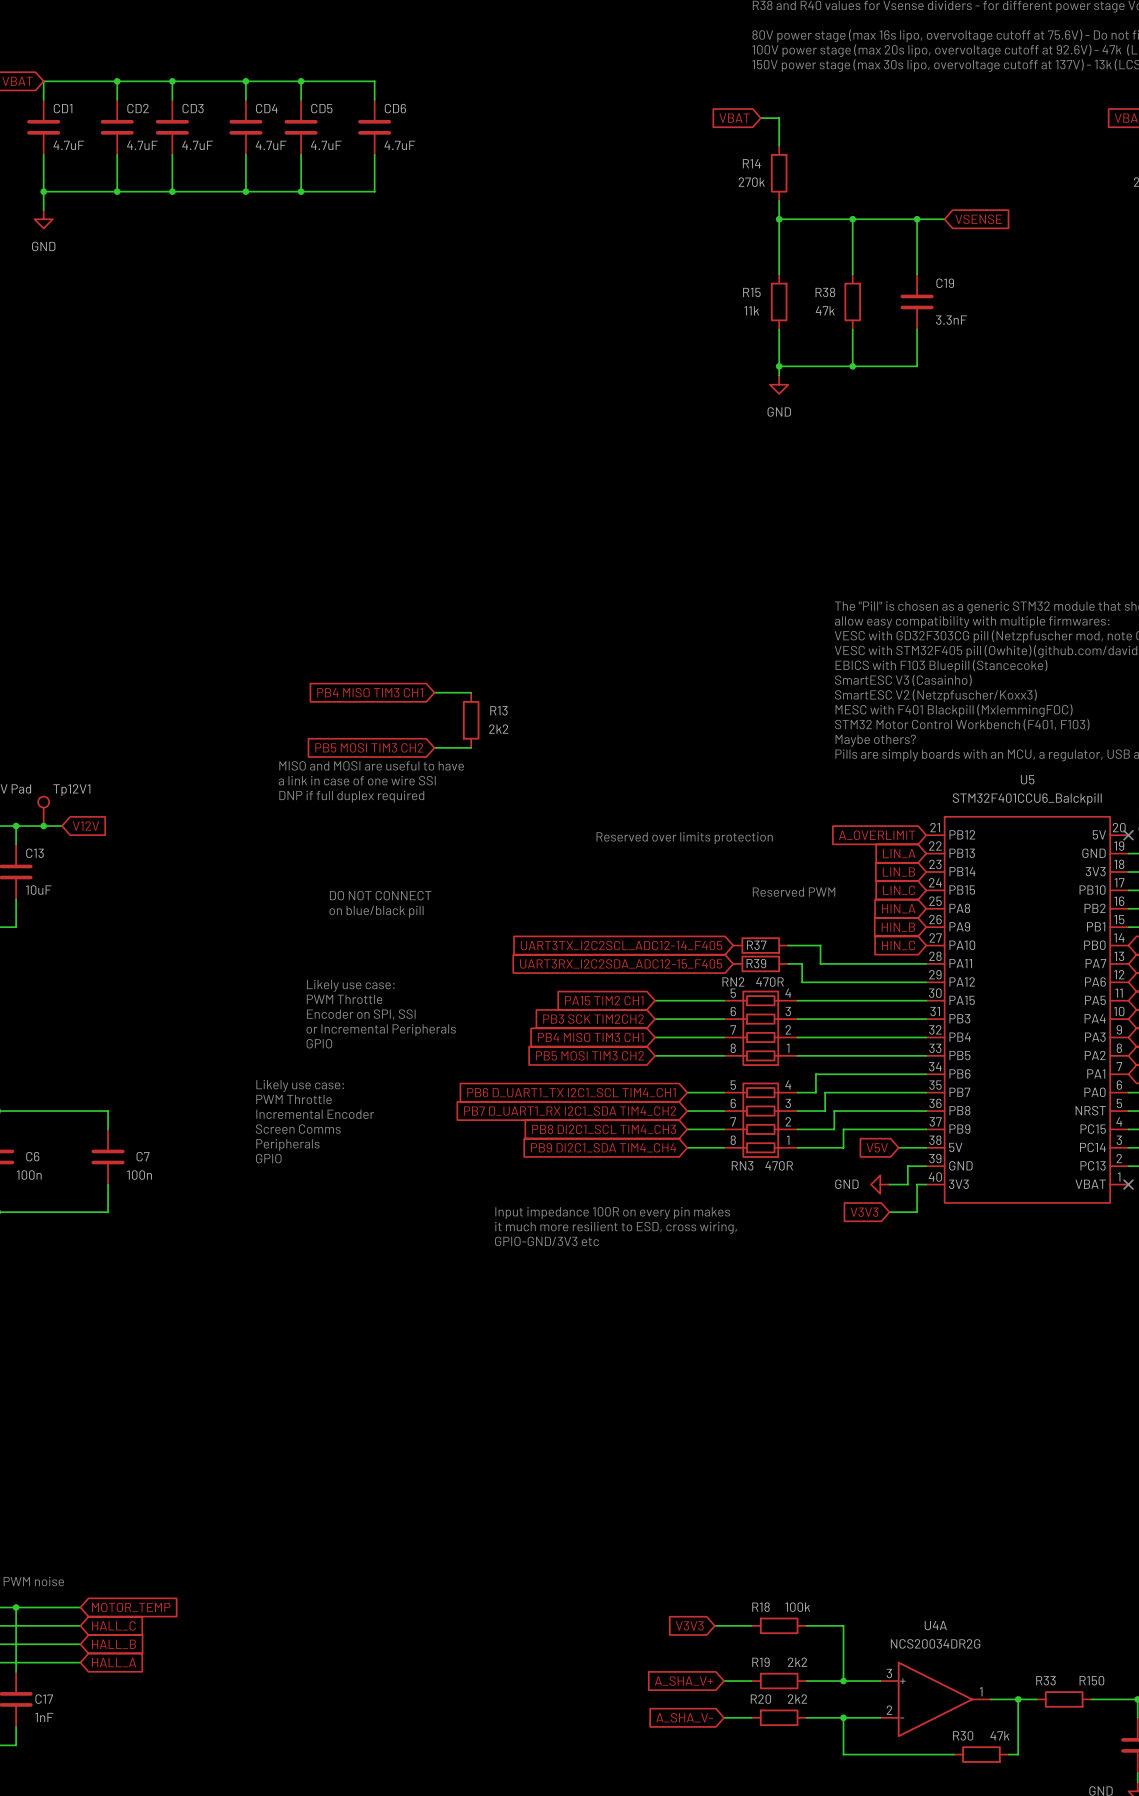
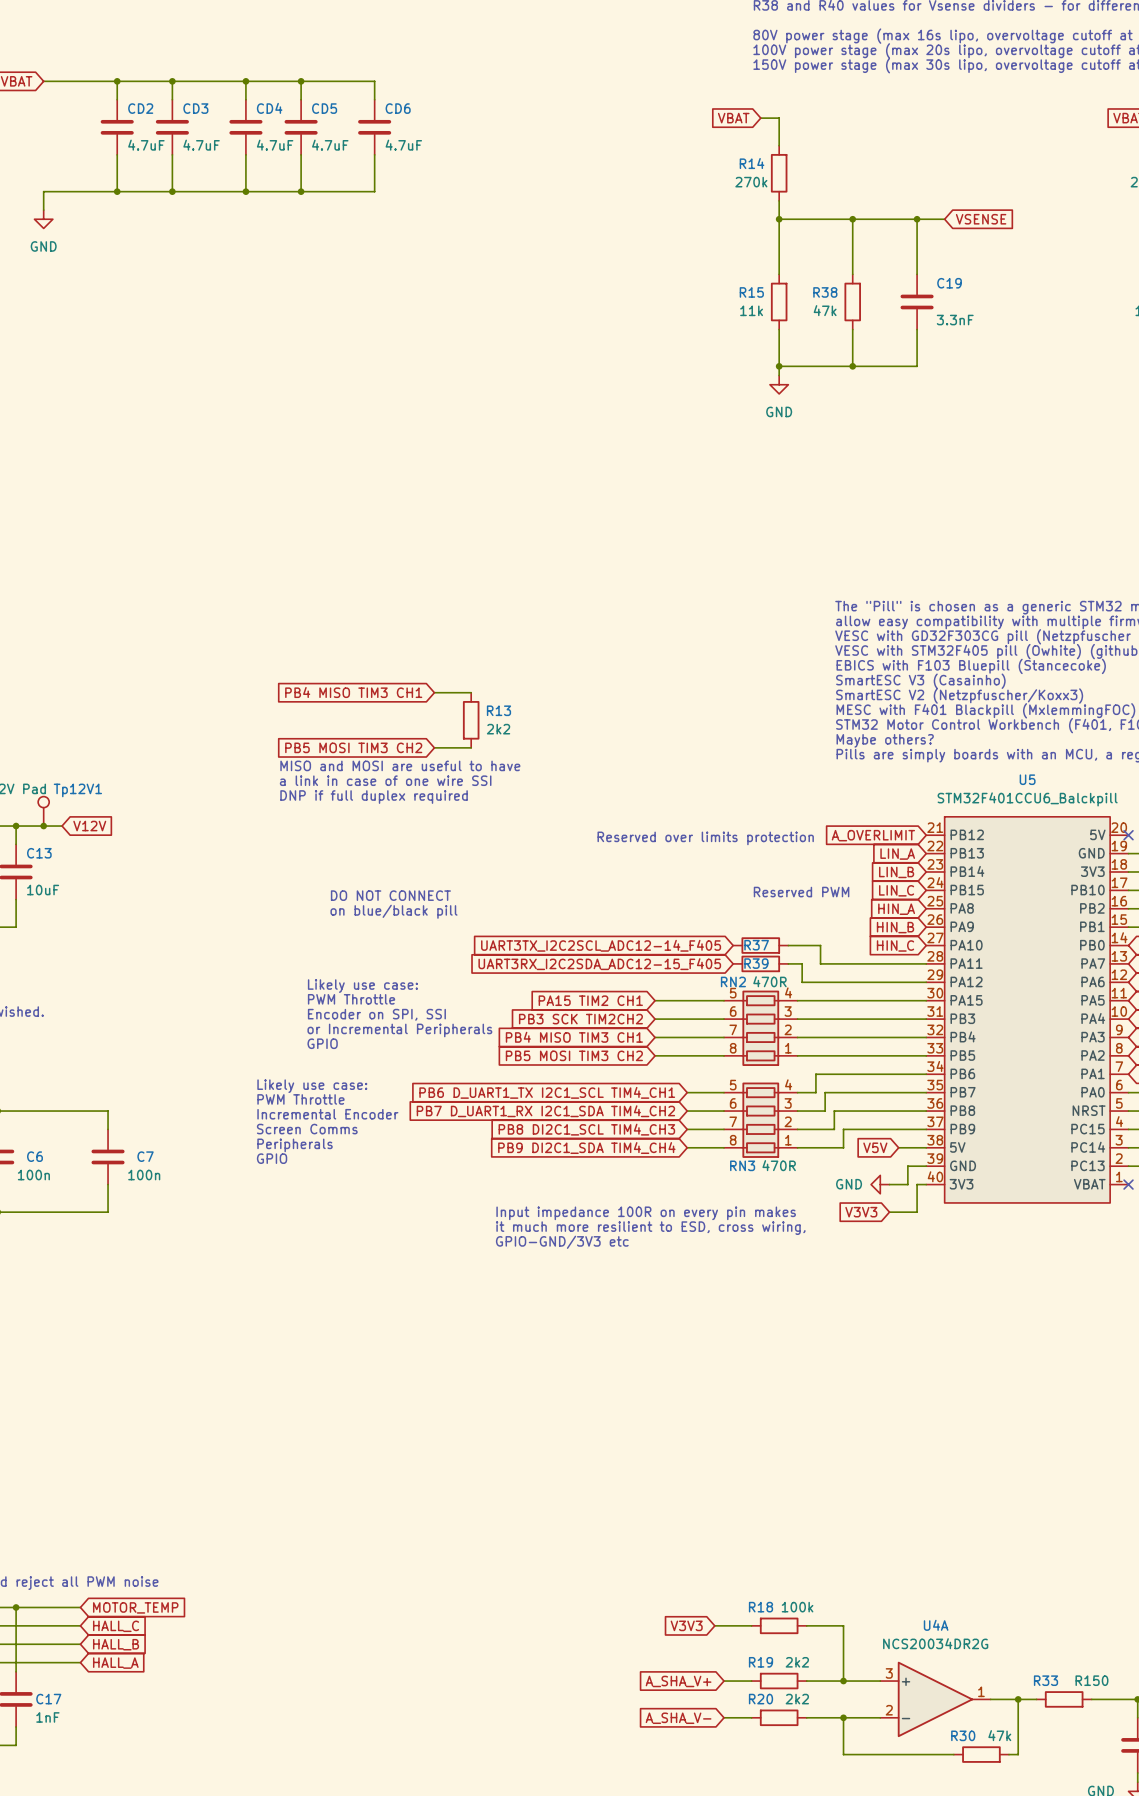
wire: (43, 81) (43, 99) -> none
CD1: 4.7uF (43, 127) -> none
wire: (43, 154) (43, 191) -> none
junction: (43, 191) -> none

